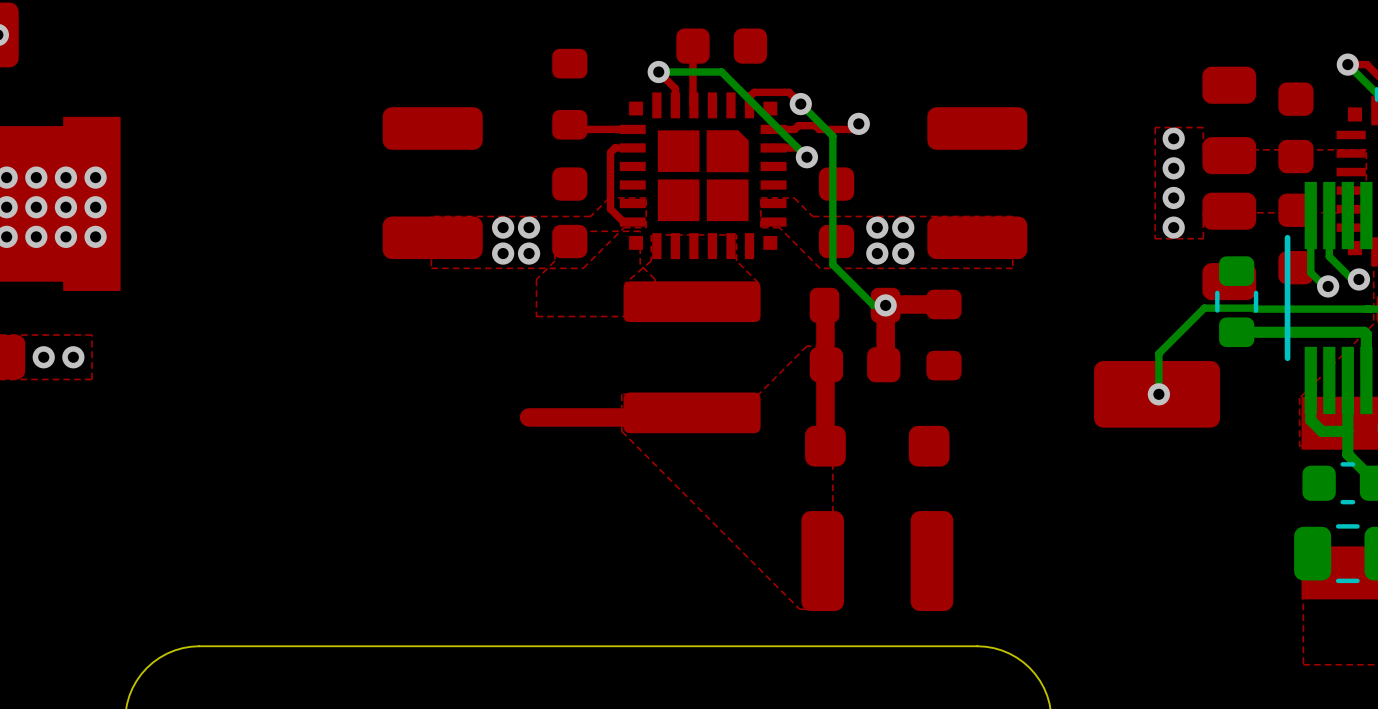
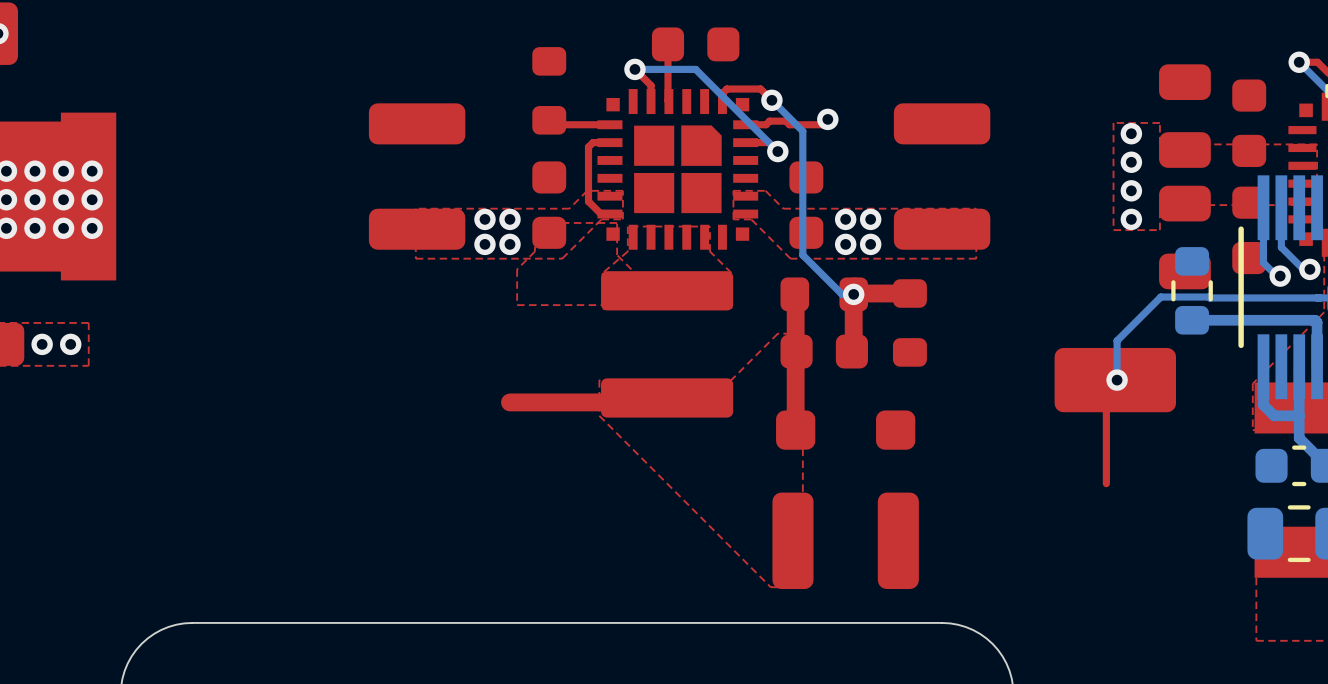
top track: none -> (1115, 380) (1106, 389) (1106, 483)

